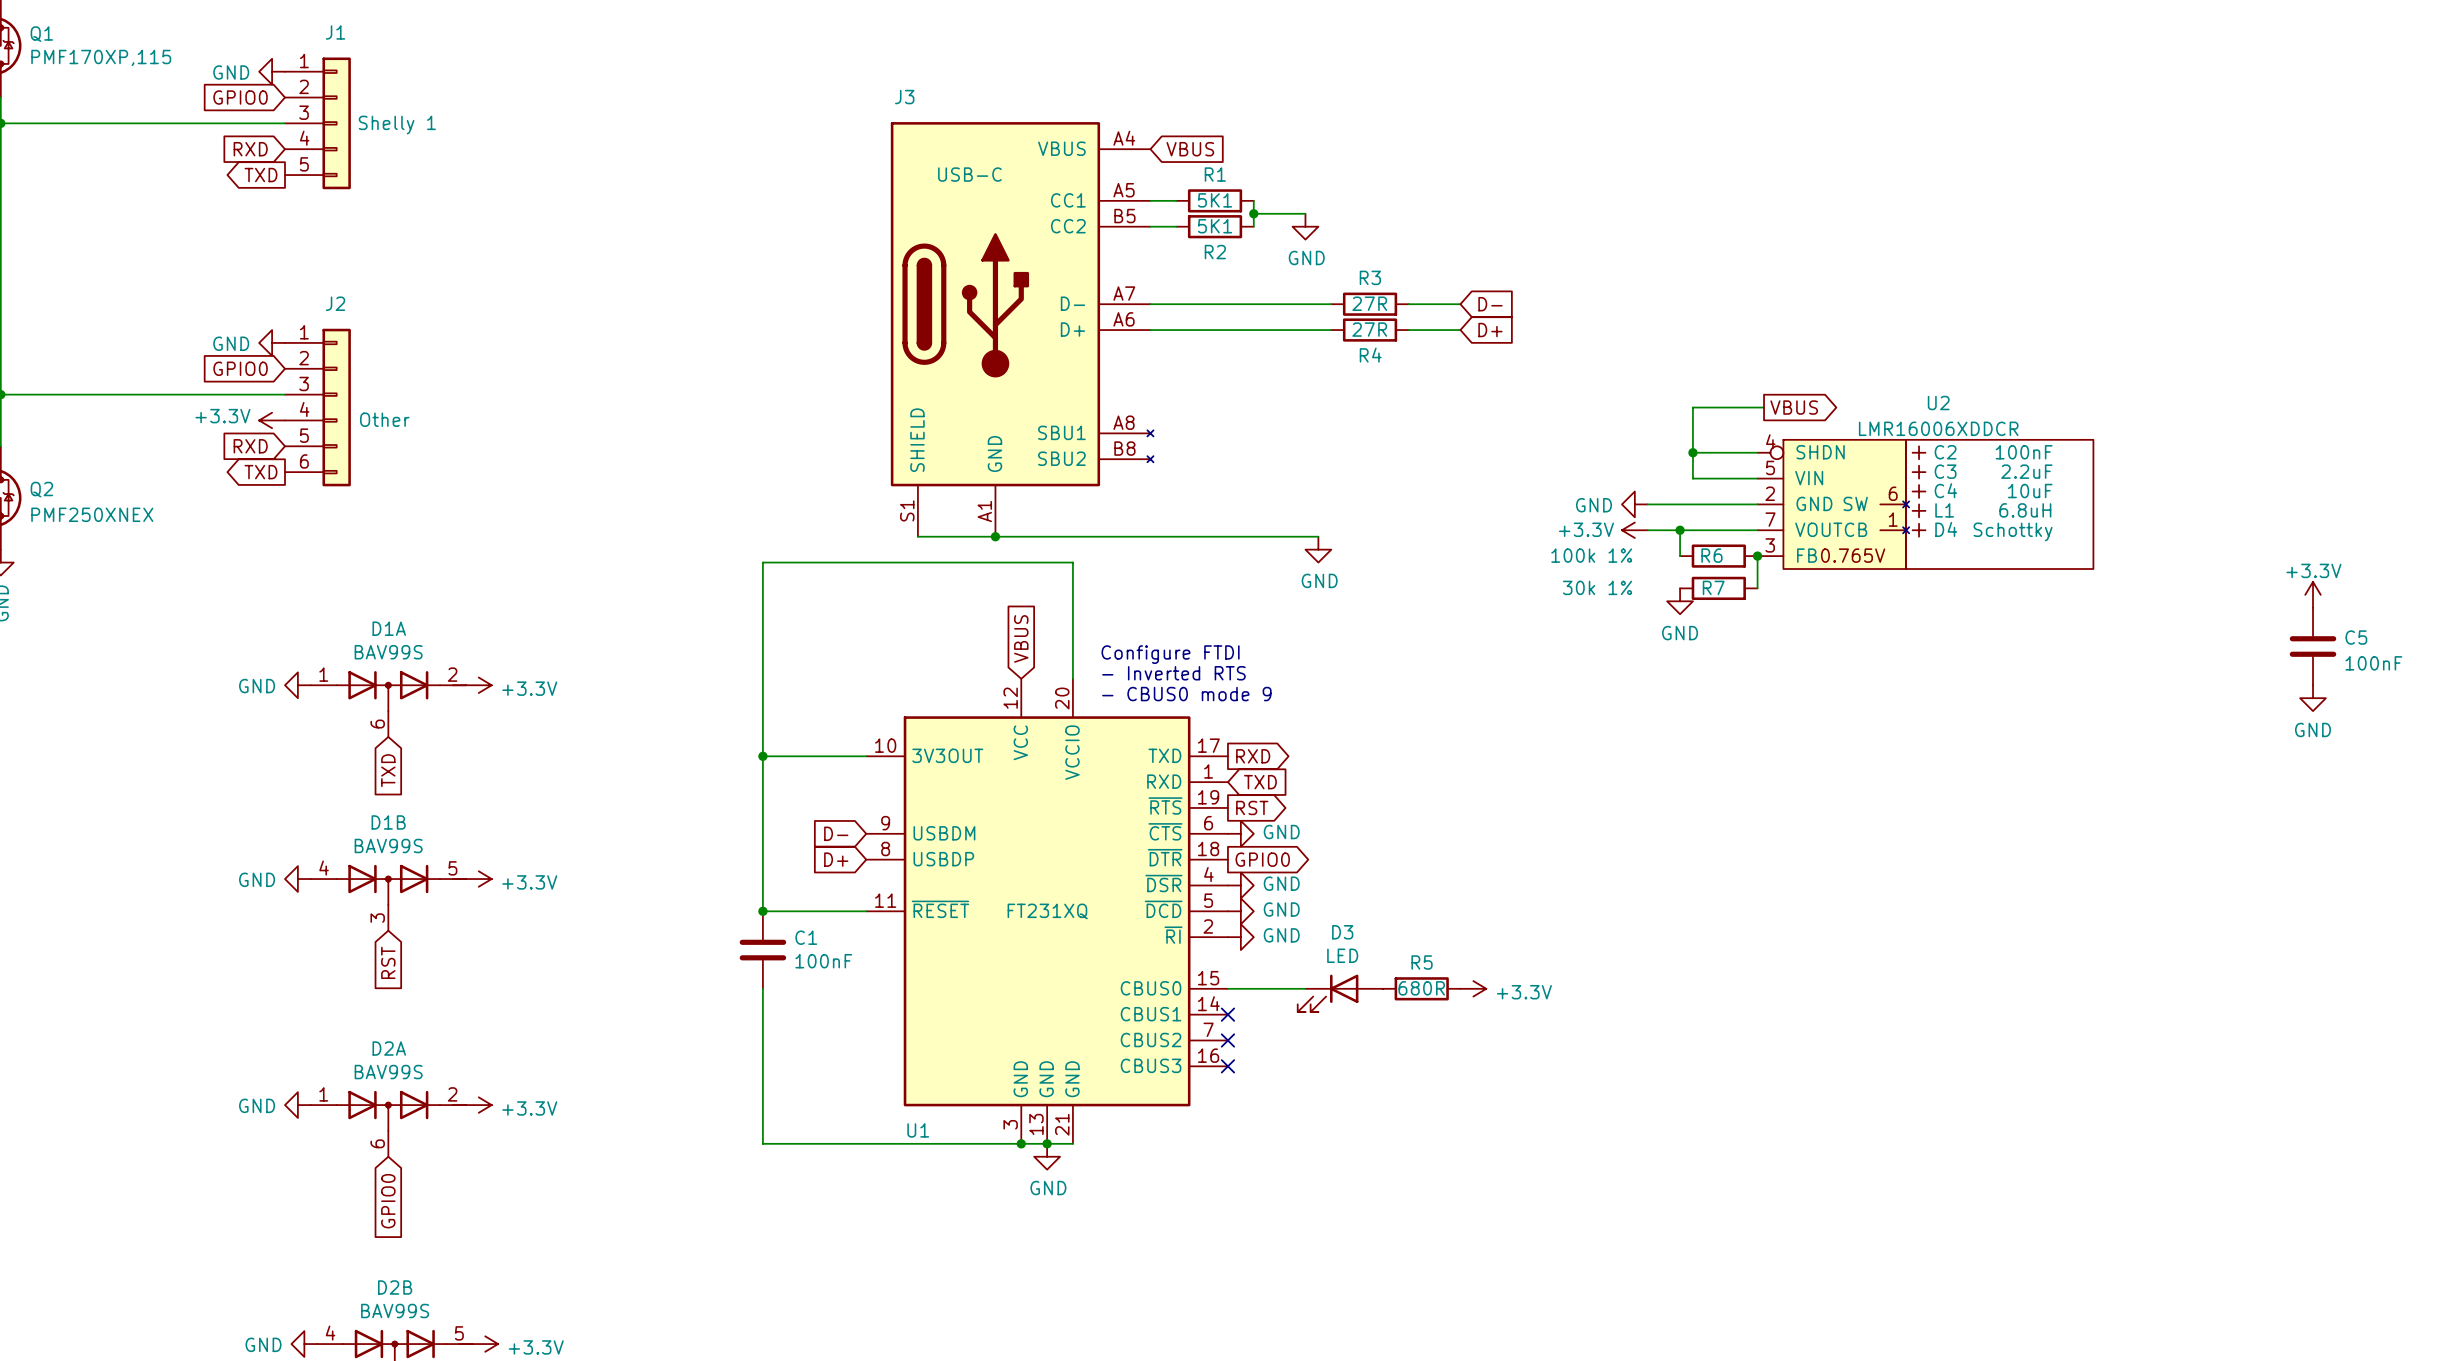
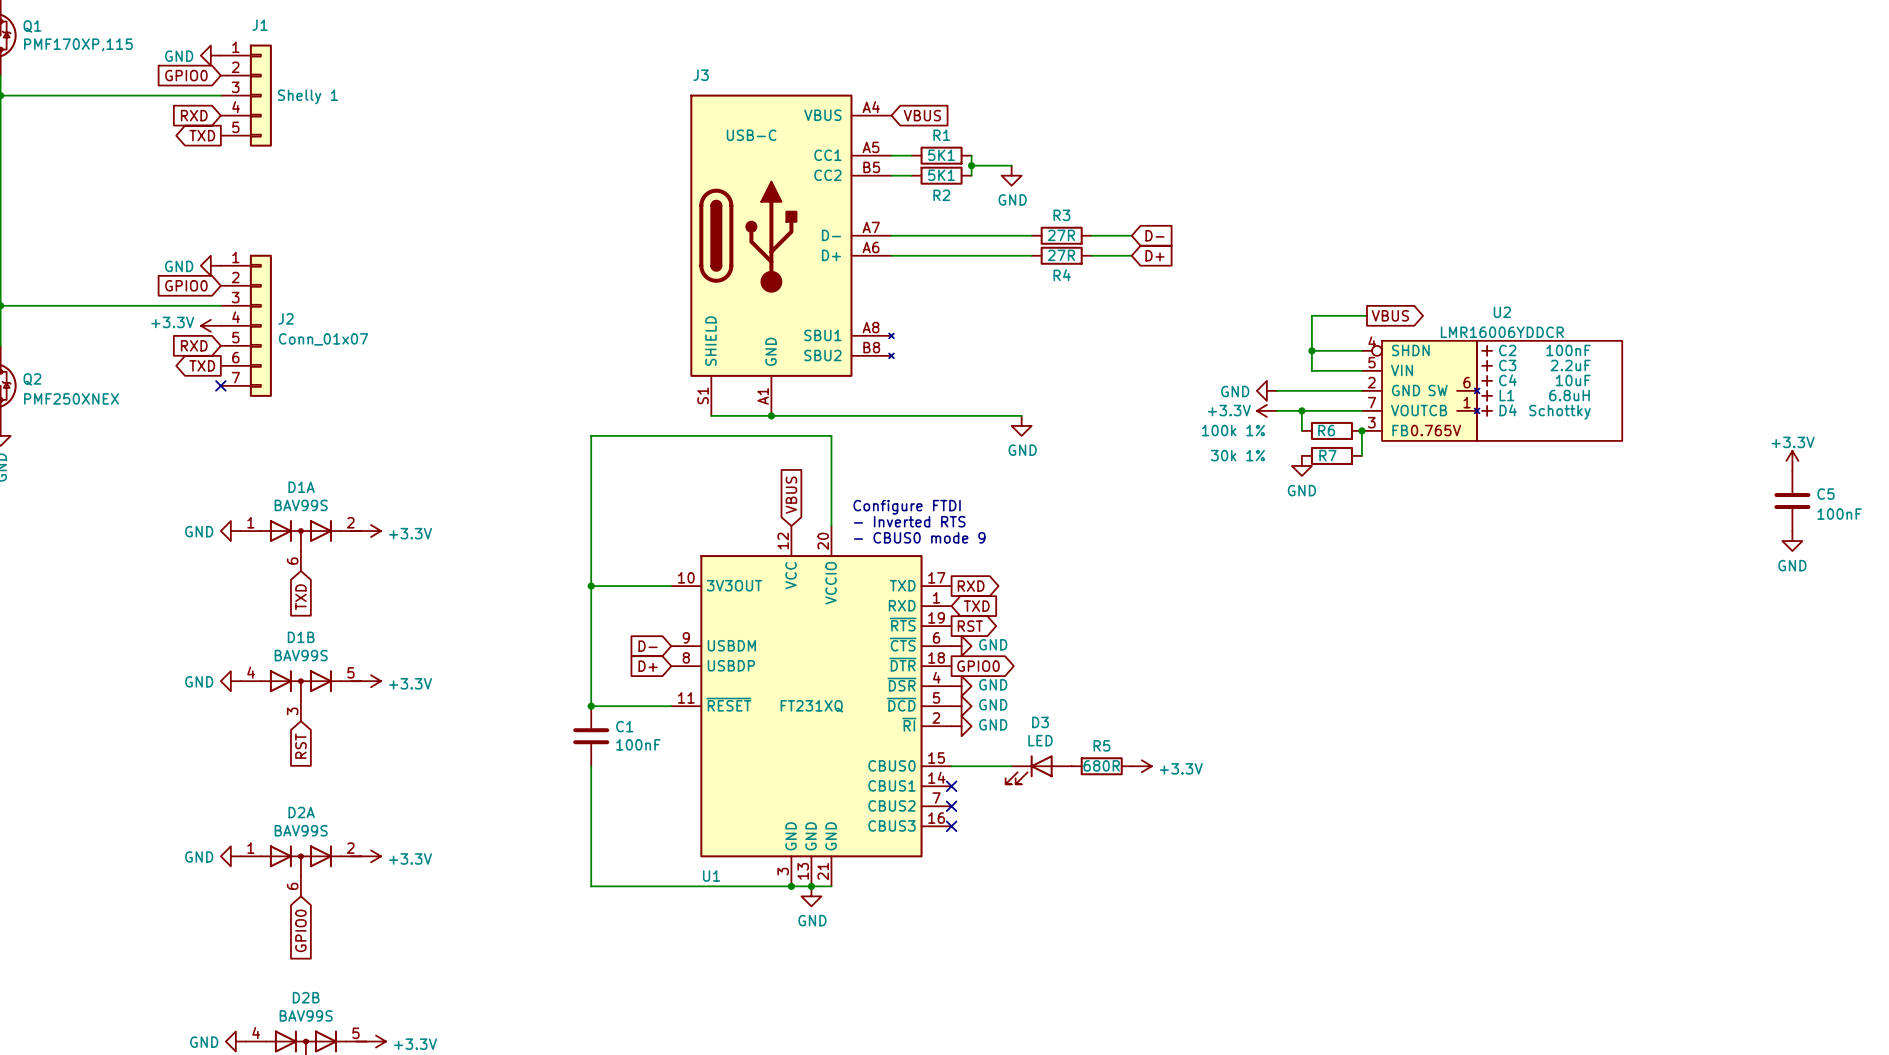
J2 name position: J2 (335, 303) -> J2 (286, 318)
J2 symbol: [285, 328, 351, 487] -> [220, 254, 272, 397]
J2 value: Other (384, 419) -> Conn_01x07 (323, 339)
U2 value: LMR16006XDDCR (1938, 428) -> LMR16006YDDCR (1502, 332)
no-connect mark: none -> (220, 385)

